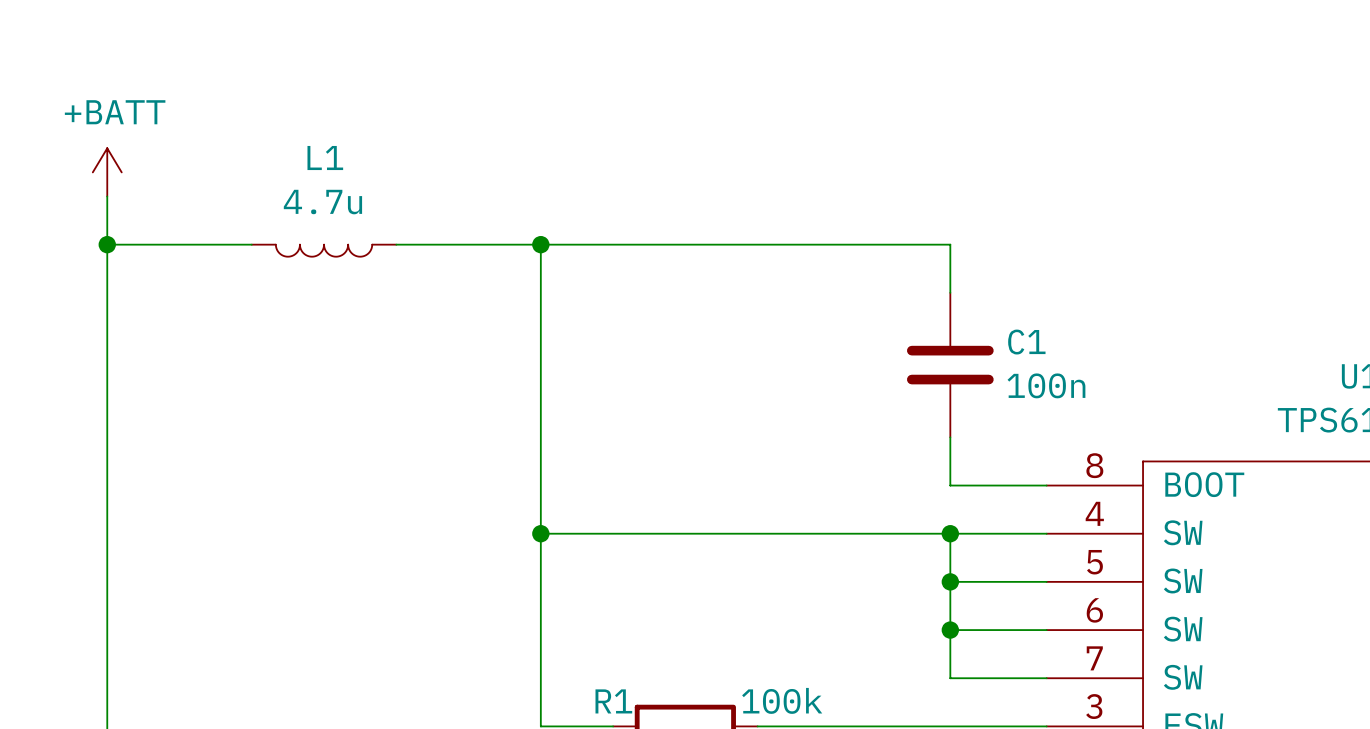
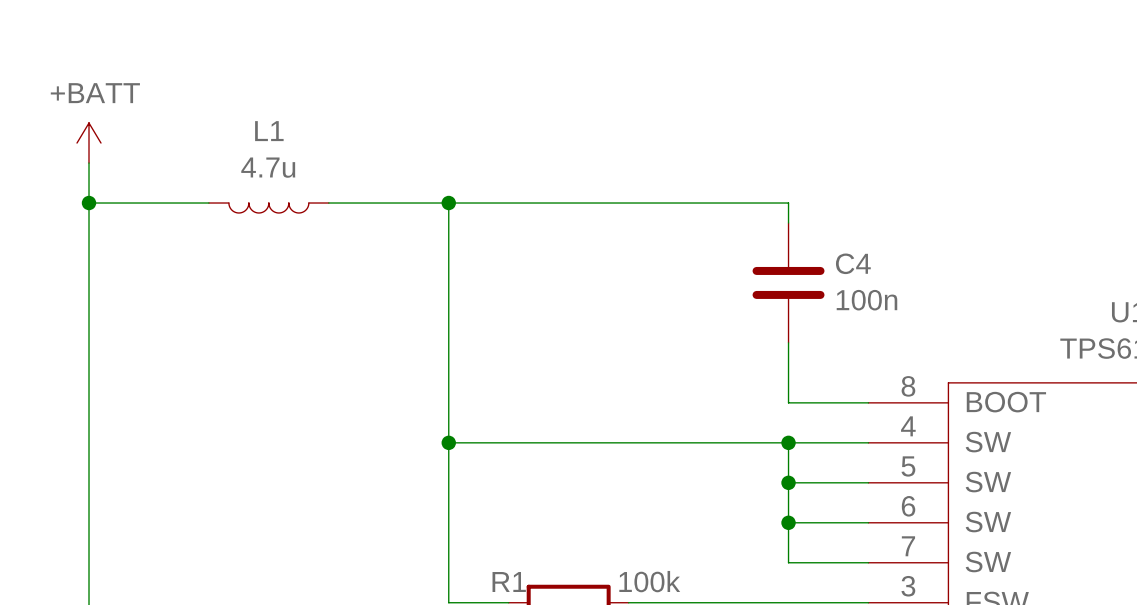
C4: none -> 100n (788, 282)
C1: 100n (950, 365) -> none

